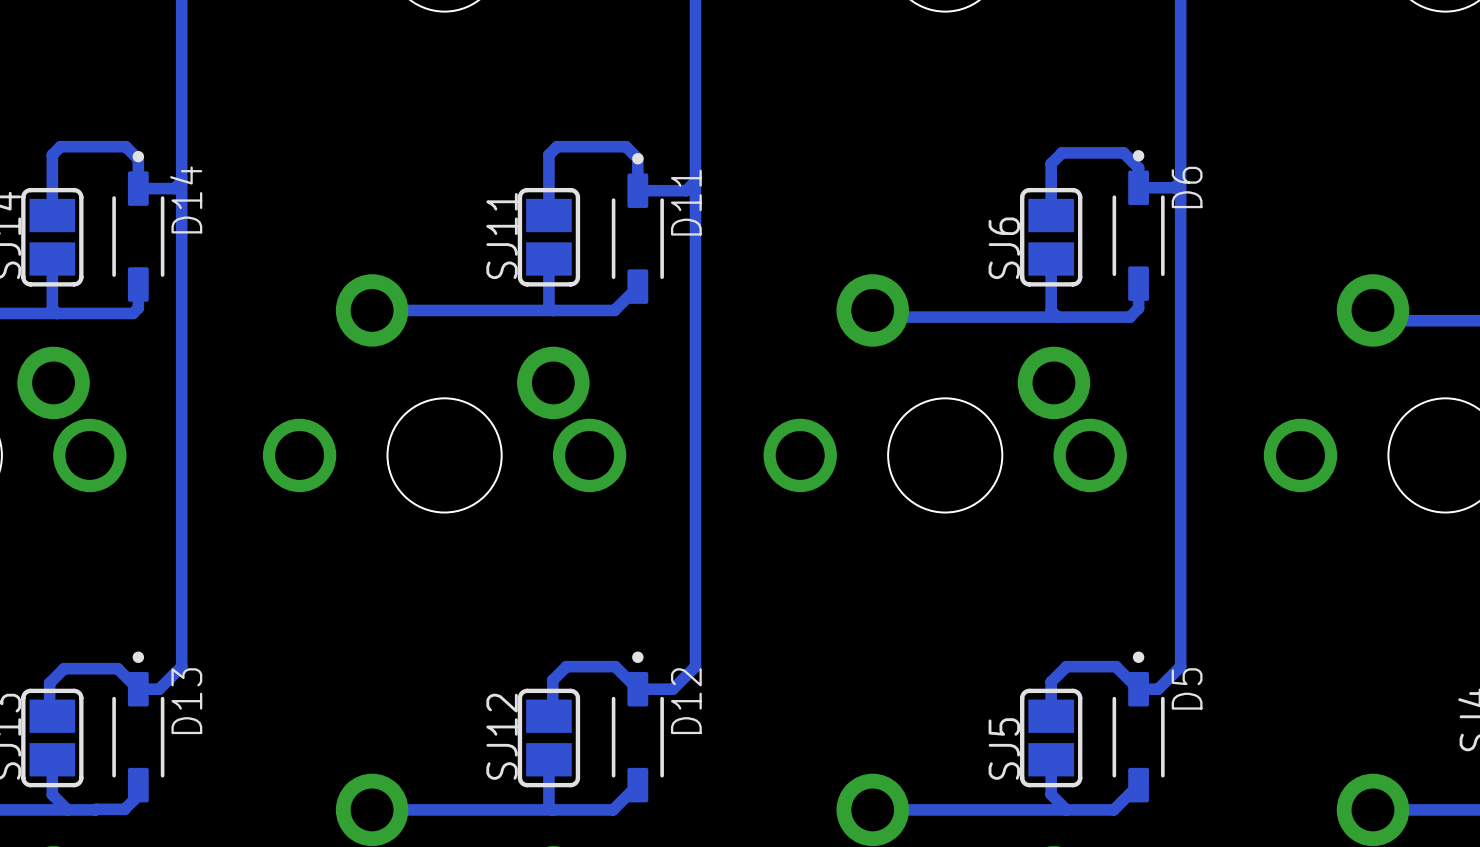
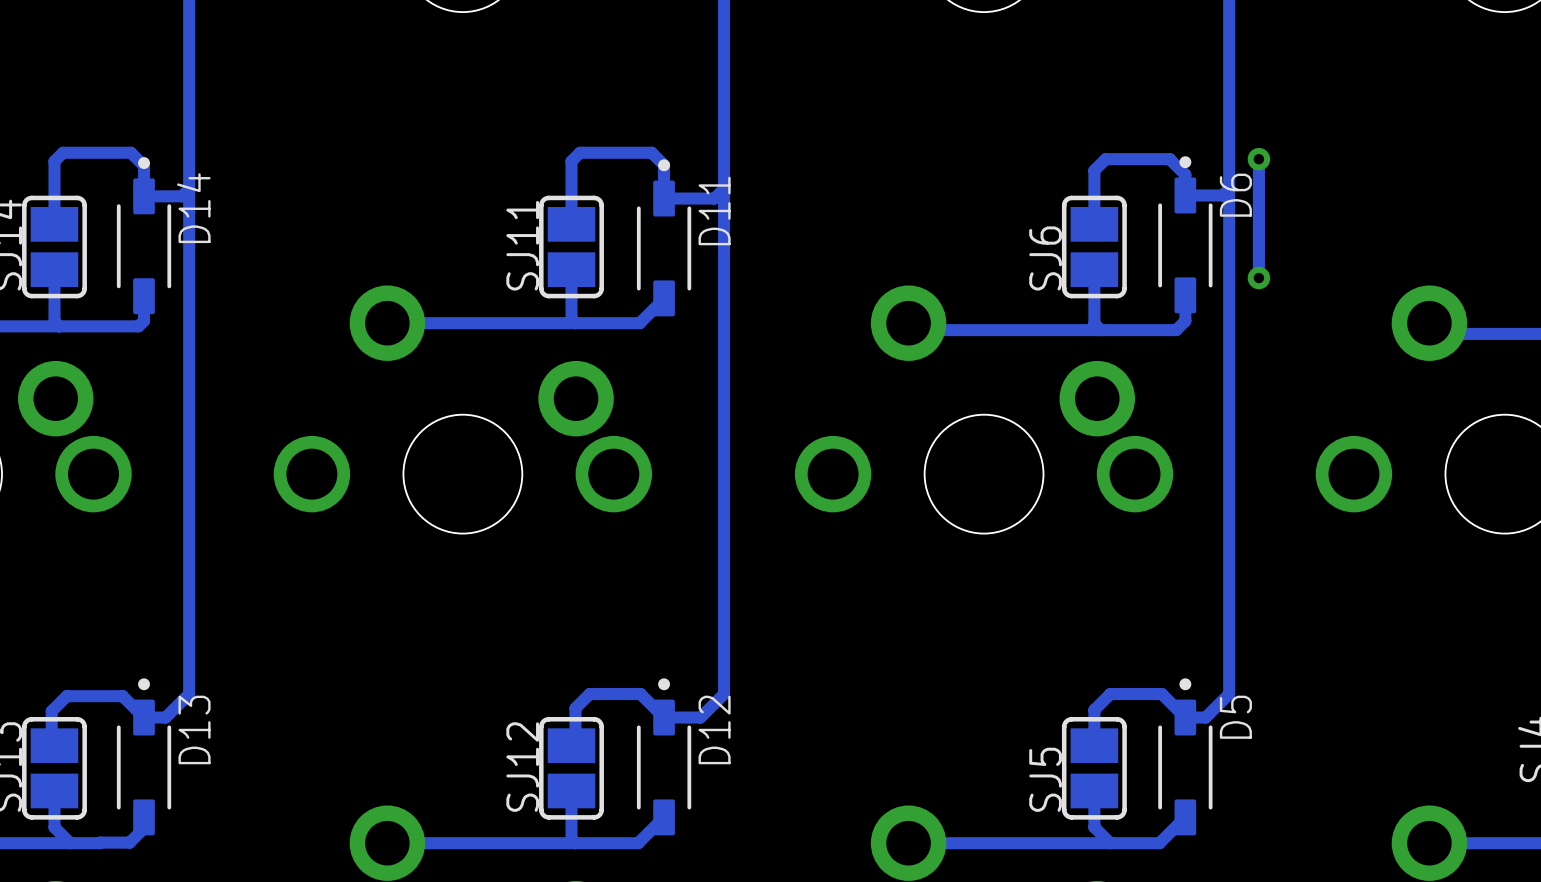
track: none -> (1258, 159) (1258, 278)
via: none -> (1258, 159)
via: none -> (1258, 278)

